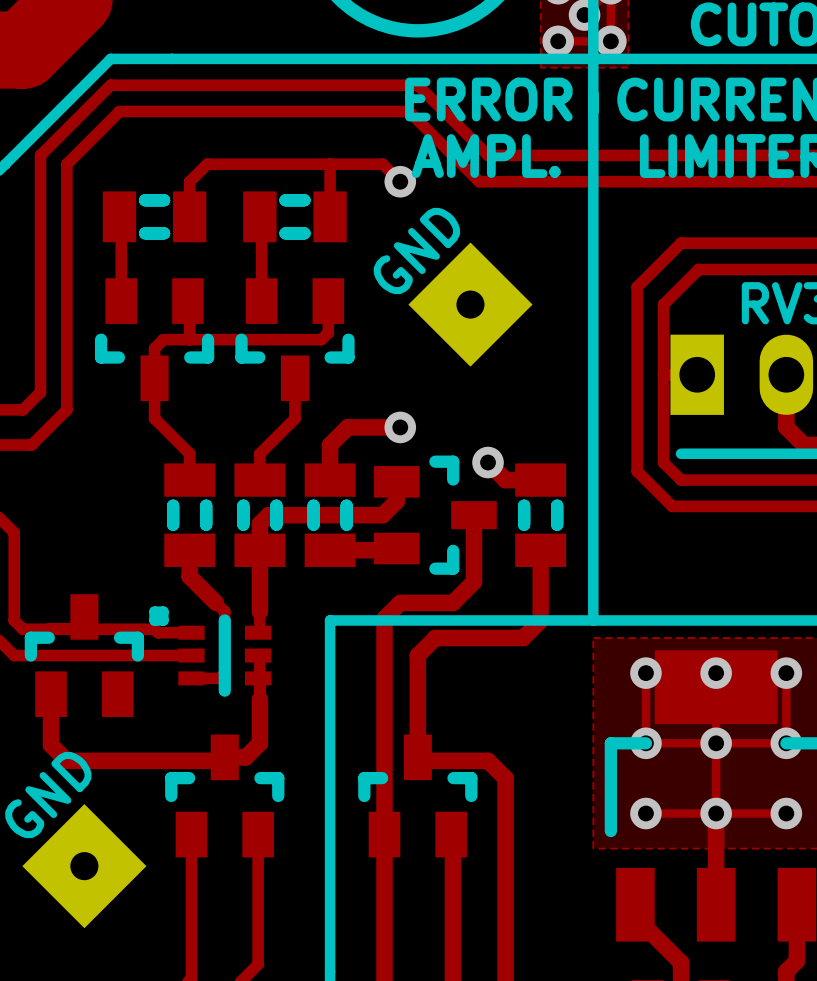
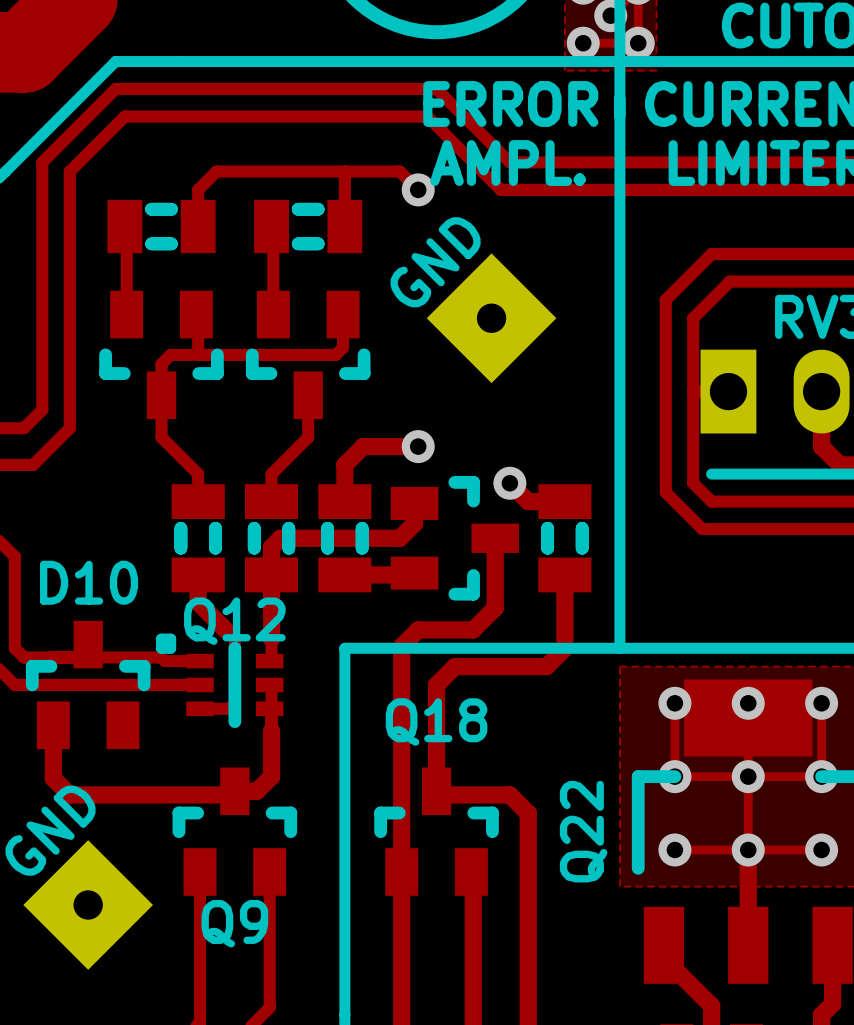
D10 name: none -> D10 (89, 582)
Q12 name: none -> Q12 (234, 621)
Q18 name: none -> Q18 (436, 722)
Q22 name: none -> Q22 (583, 831)
Q9 name: none -> Q9 (234, 923)

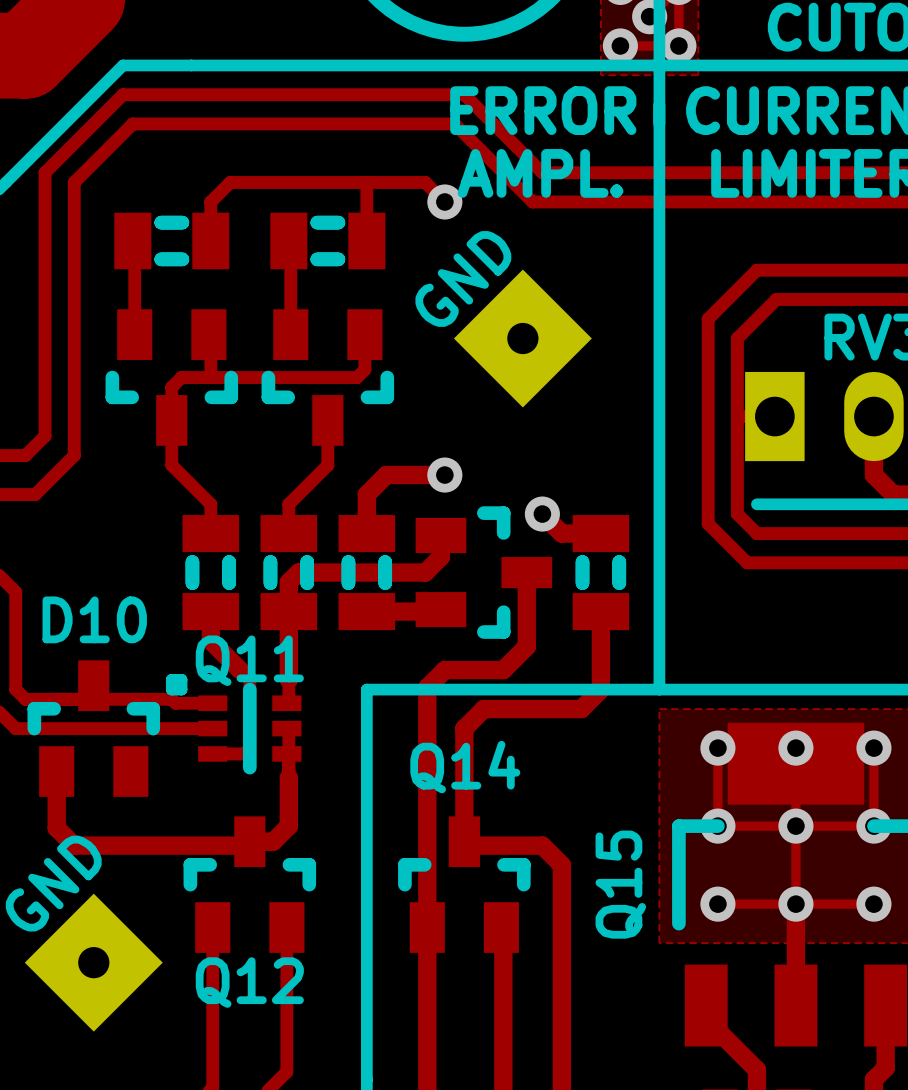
Q12 name: Q12 (234, 621) -> Q11 (249, 660)
Q18 name: Q18 (436, 722) -> Q14 (465, 767)
Q22 name: Q22 (583, 831) -> Q15 (620, 884)
Q9 name: Q9 (234, 923) -> Q12 (249, 982)

